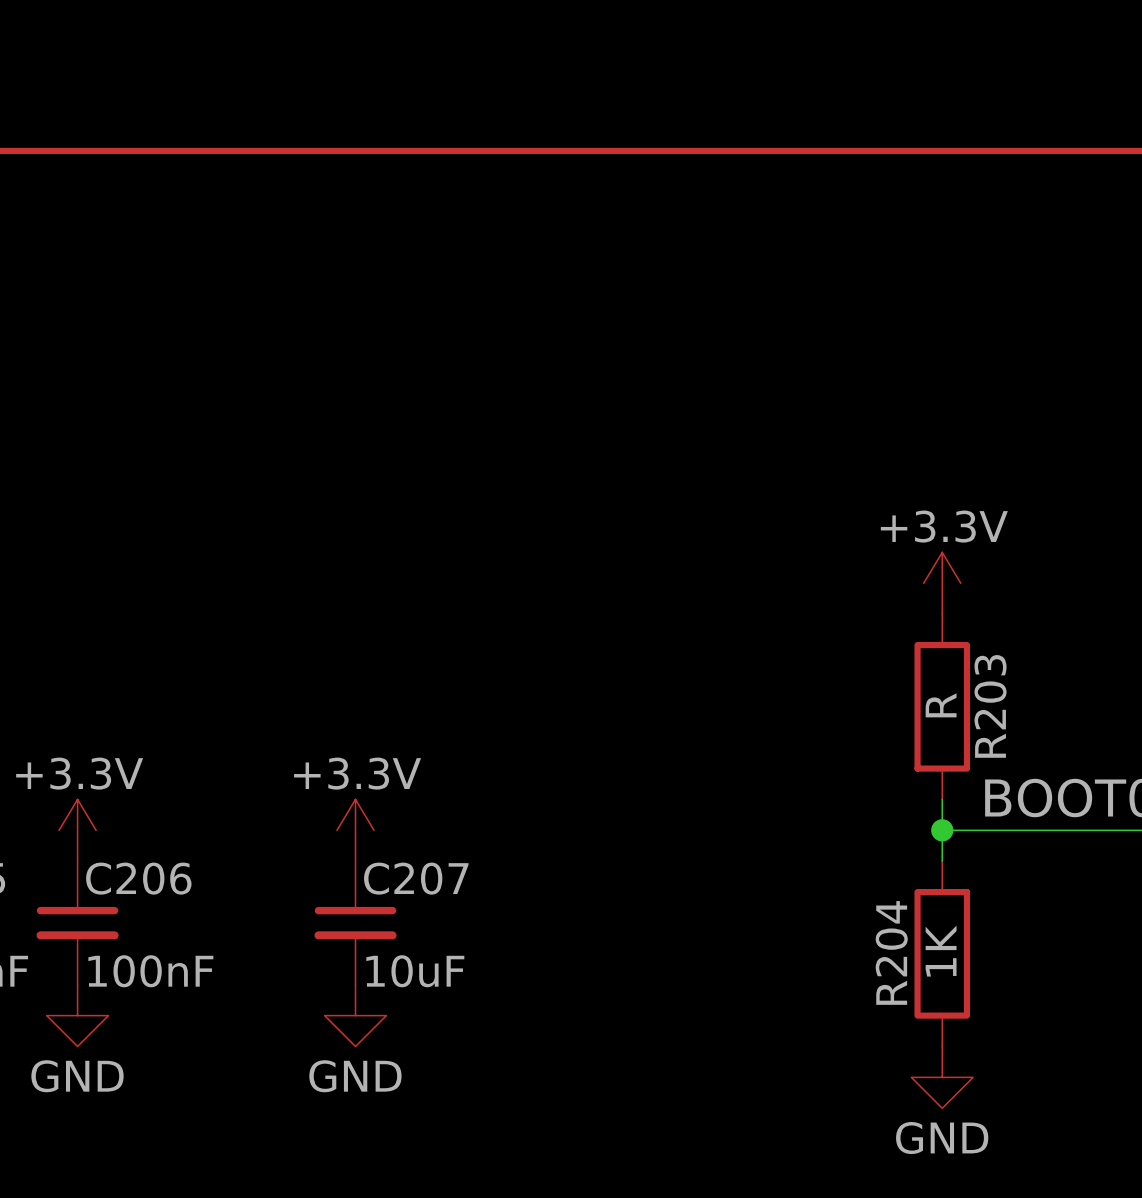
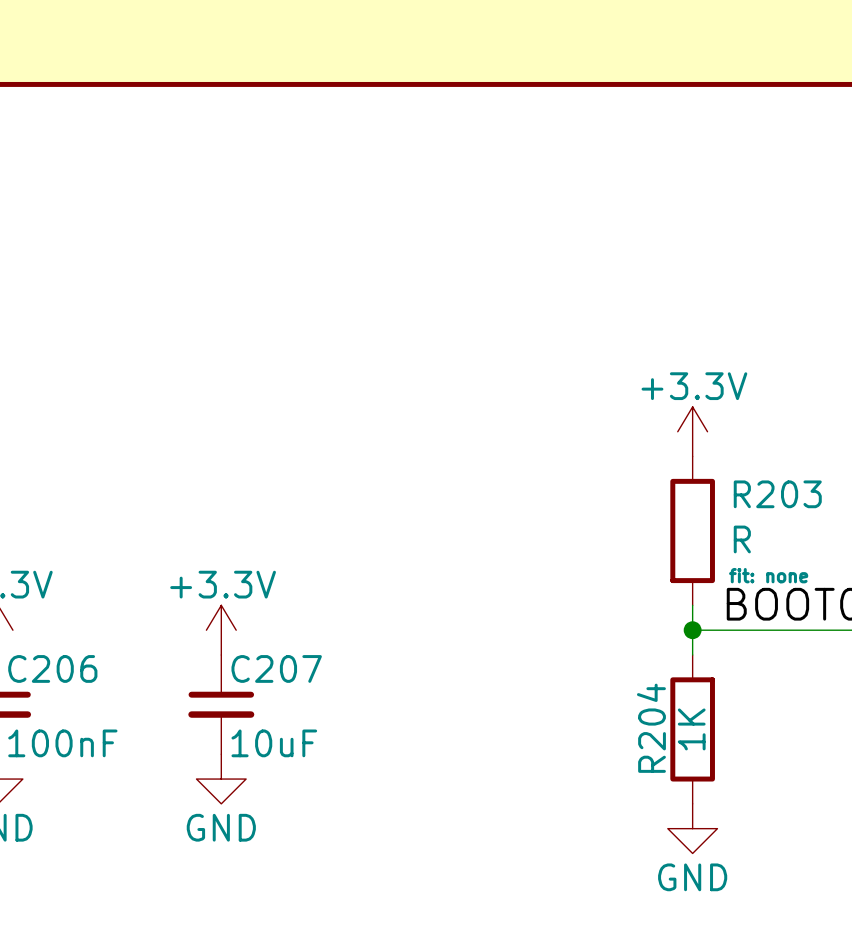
R203 value rotation: 0° (941, 705) -> 90° clockwise (742, 539)
R203 value position: R (941, 705) -> R (742, 539)
R203 name rotation: 0° (990, 706) -> 90° clockwise (777, 494)
R203 text: none -> fit: none (768, 575)

